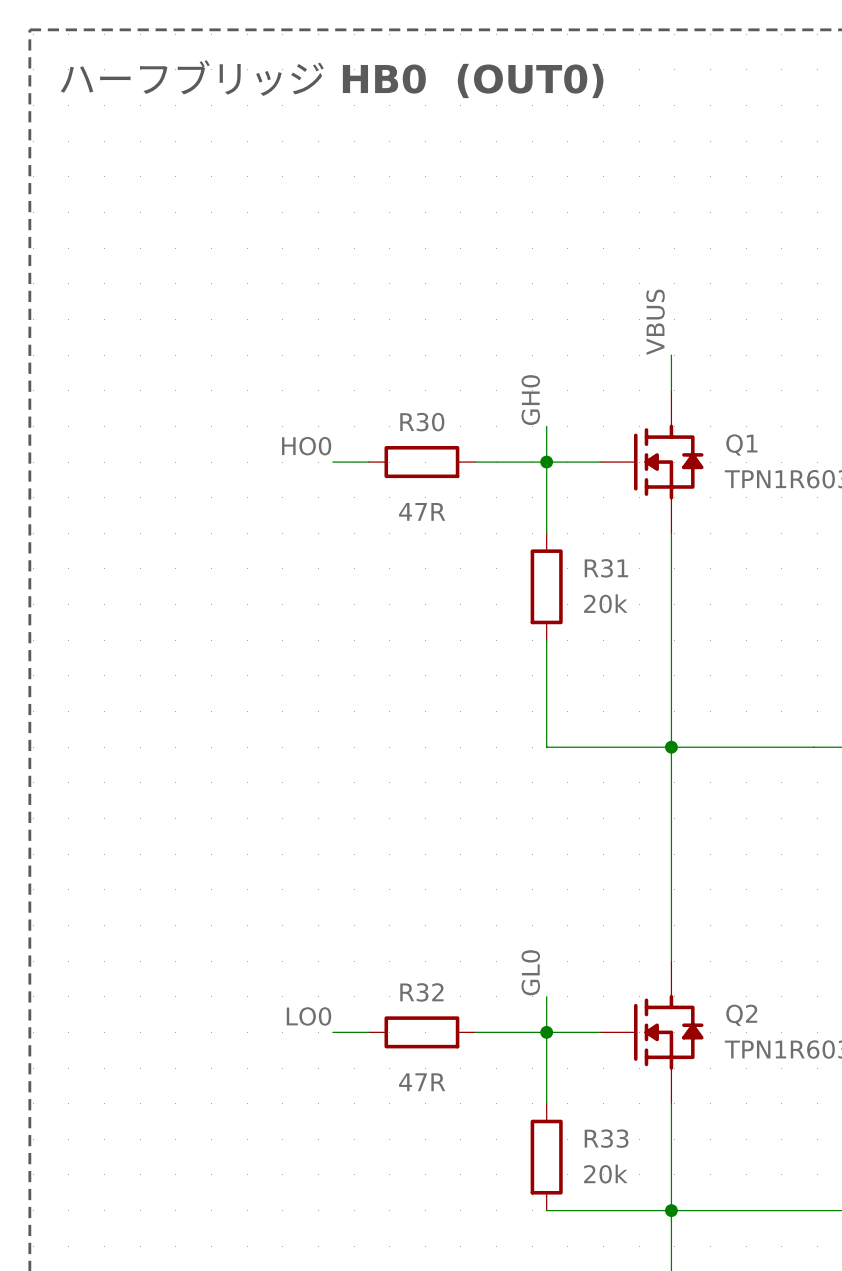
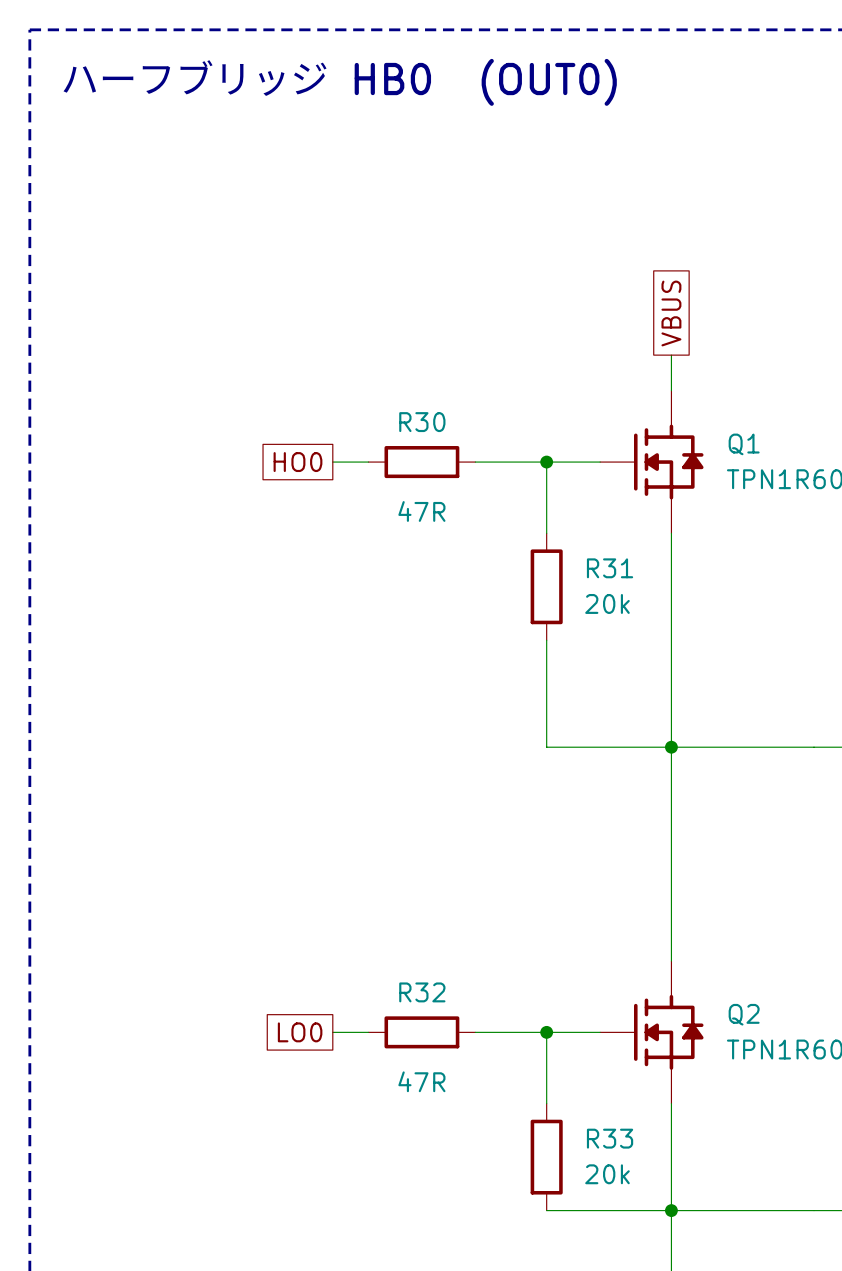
global label: none -> VBUS (671, 313)
label: VBUS (655, 322) -> none
label: GH0 (530, 400) -> none
wire: (546, 426) (546, 462) -> none
label: HO0 (306, 446) -> none
global label: none -> HO0 (297, 462)
label: GL0 (530, 972) -> none
wire: (546, 996) (546, 1032) -> none
label: LO0 (308, 1016) -> none
global label: none -> LO0 (300, 1032)

